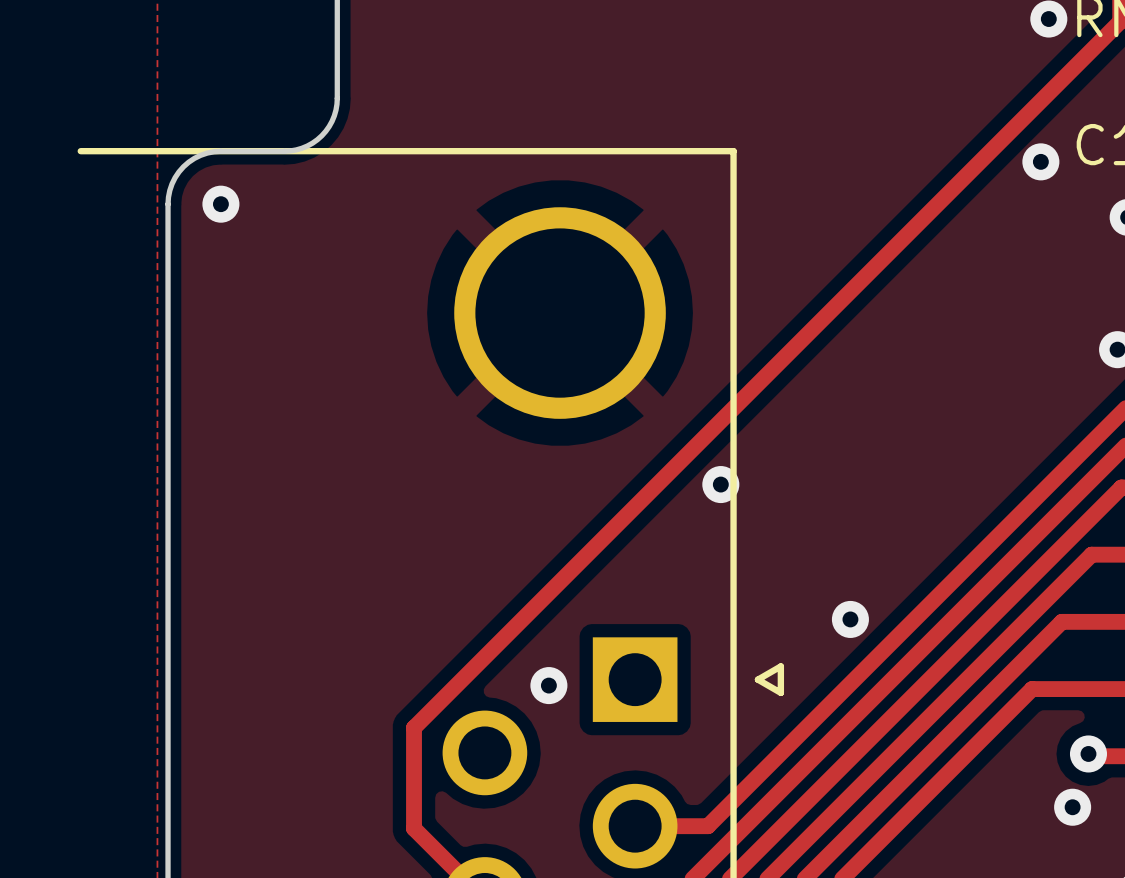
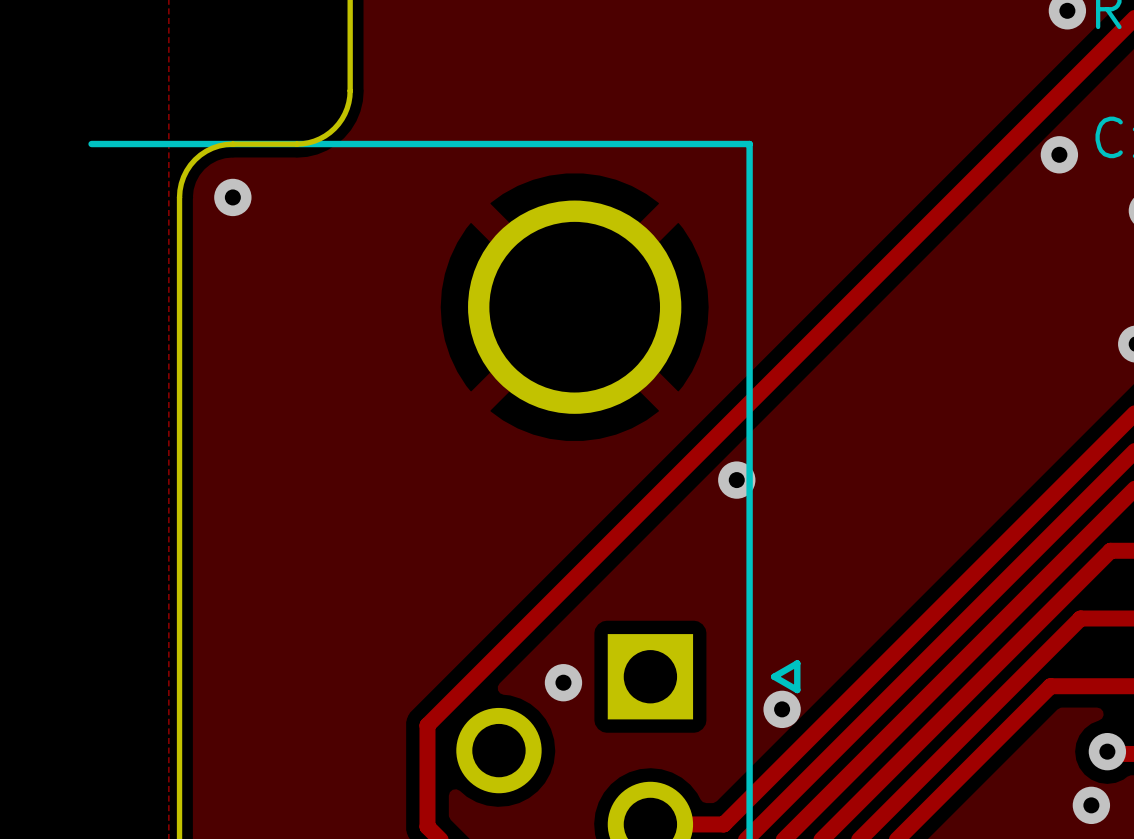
via: (850, 619) -> none
via: none -> (782, 709)

